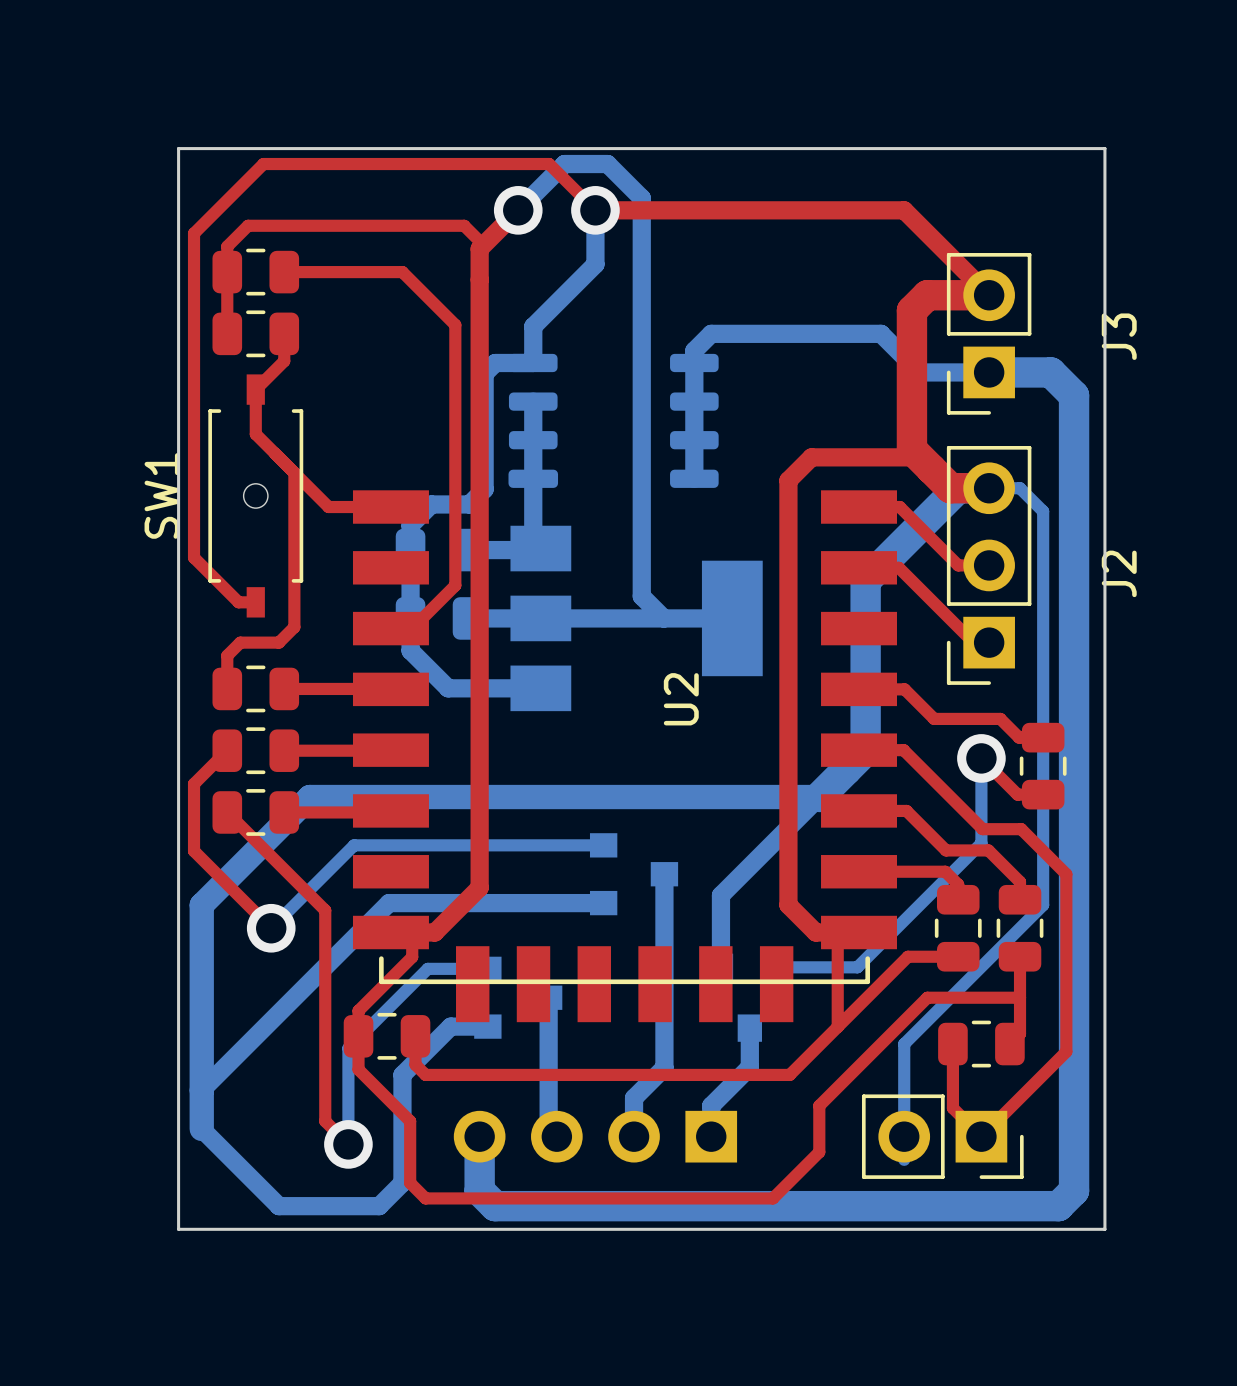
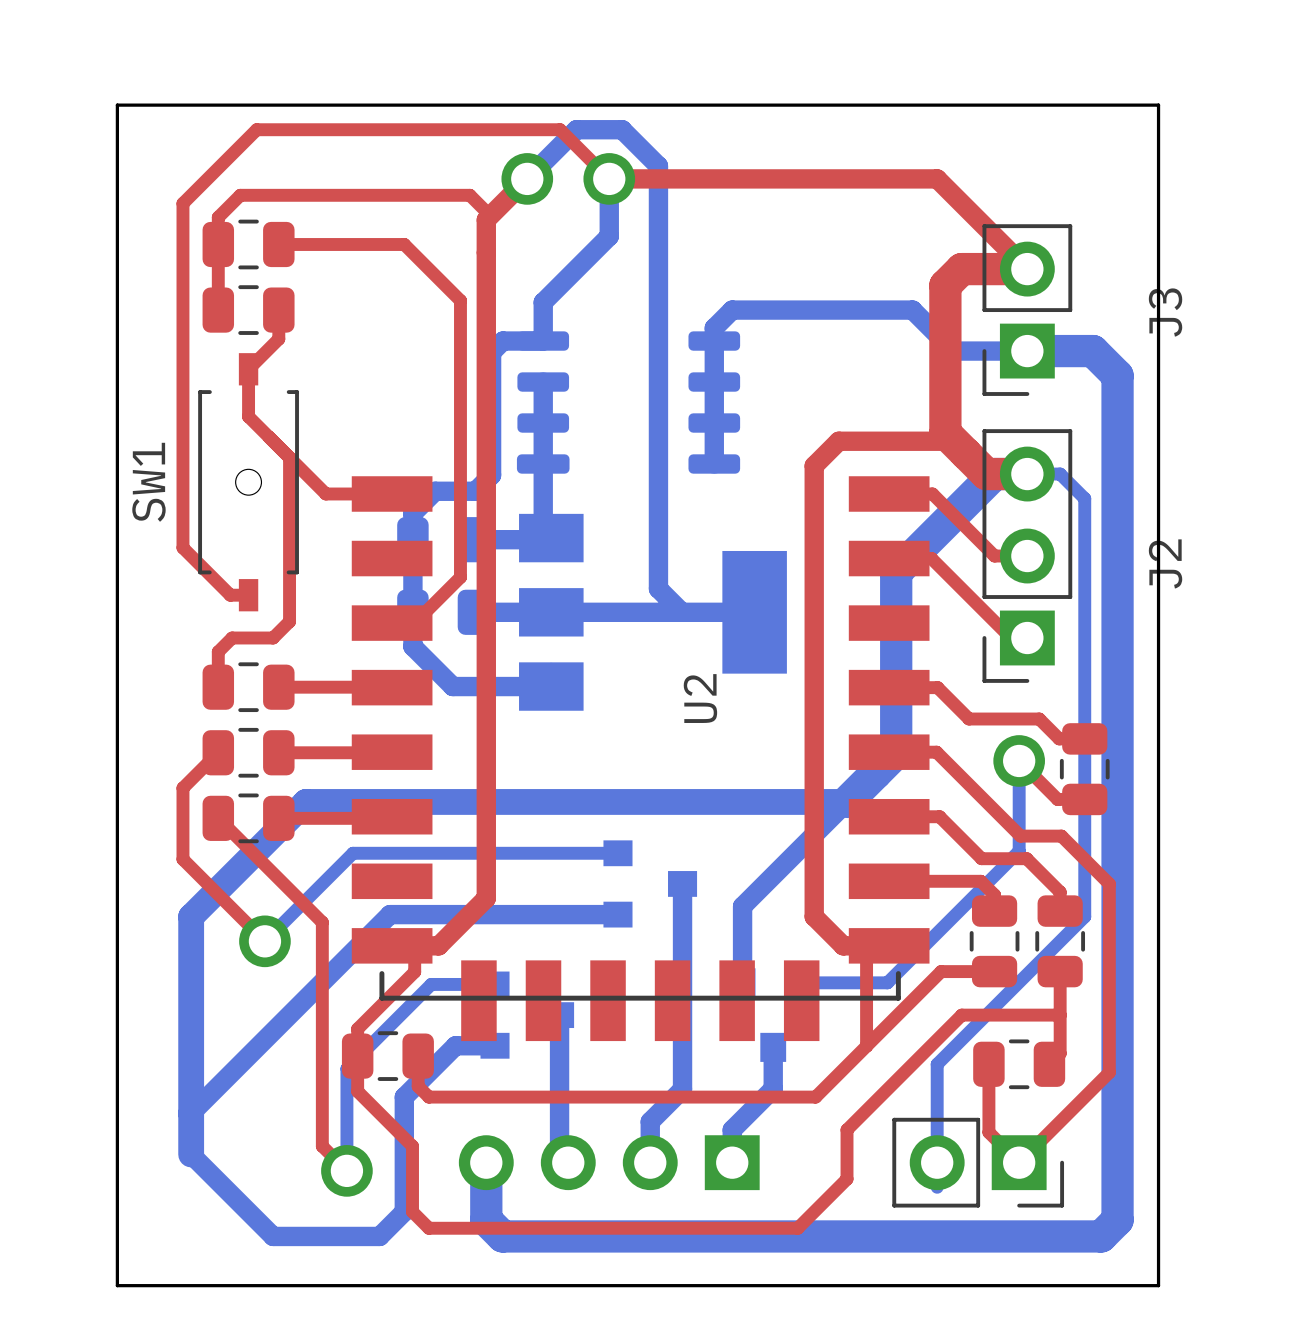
board edge: (178, 148) (1104, 148) (1104, 1229) (178, 1229) (178, 148) -> (117, 105) (117, 1285) (1158, 1285) (1158, 105) (117, 105)

